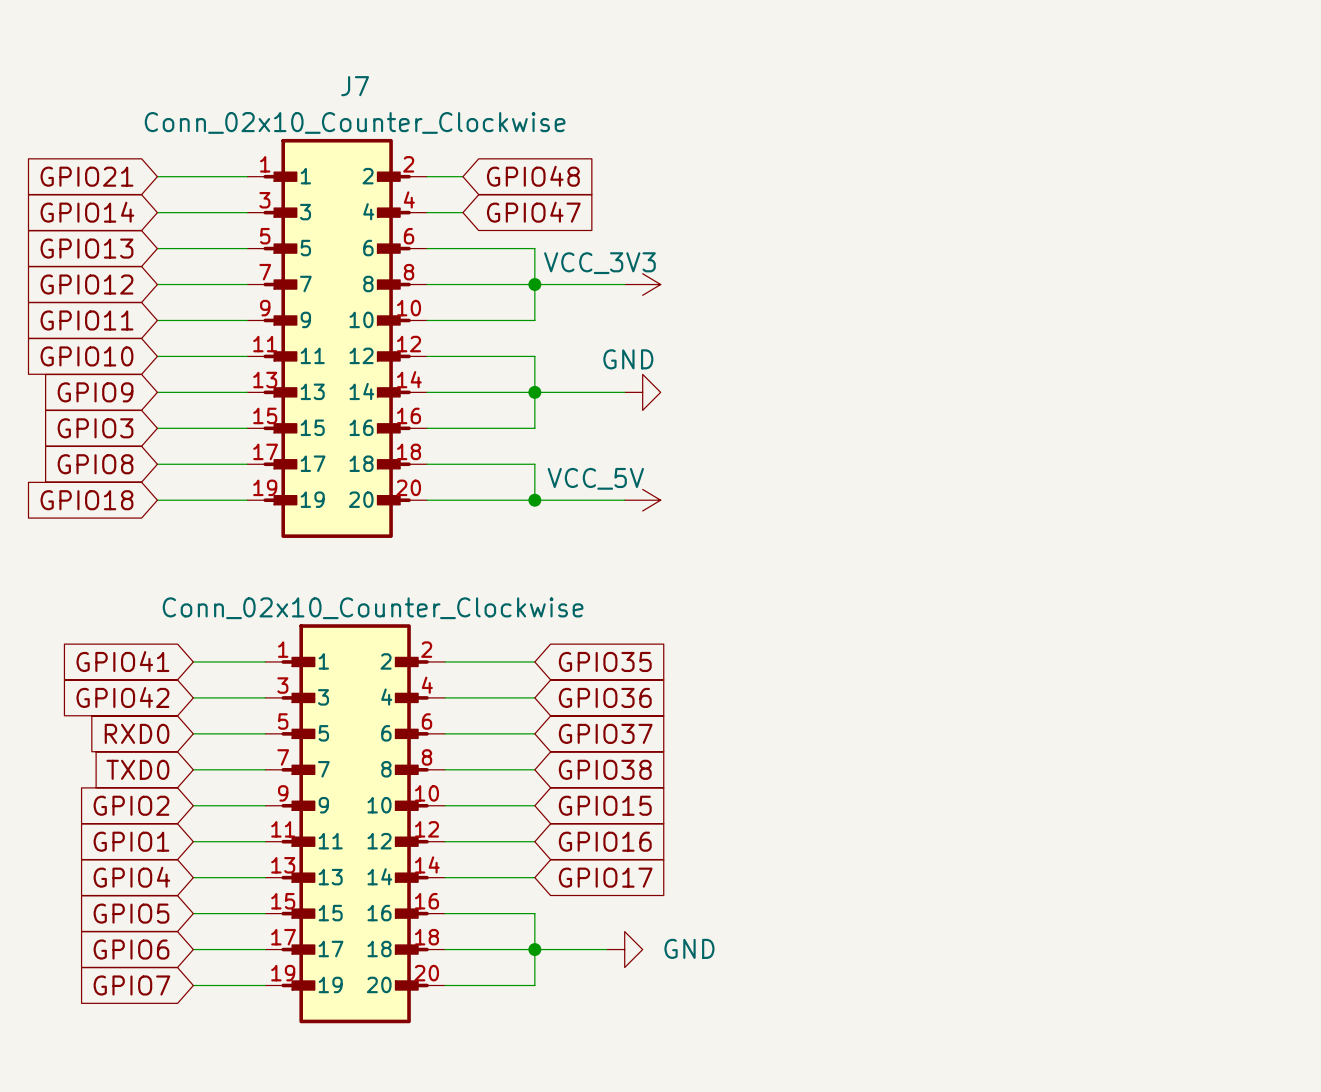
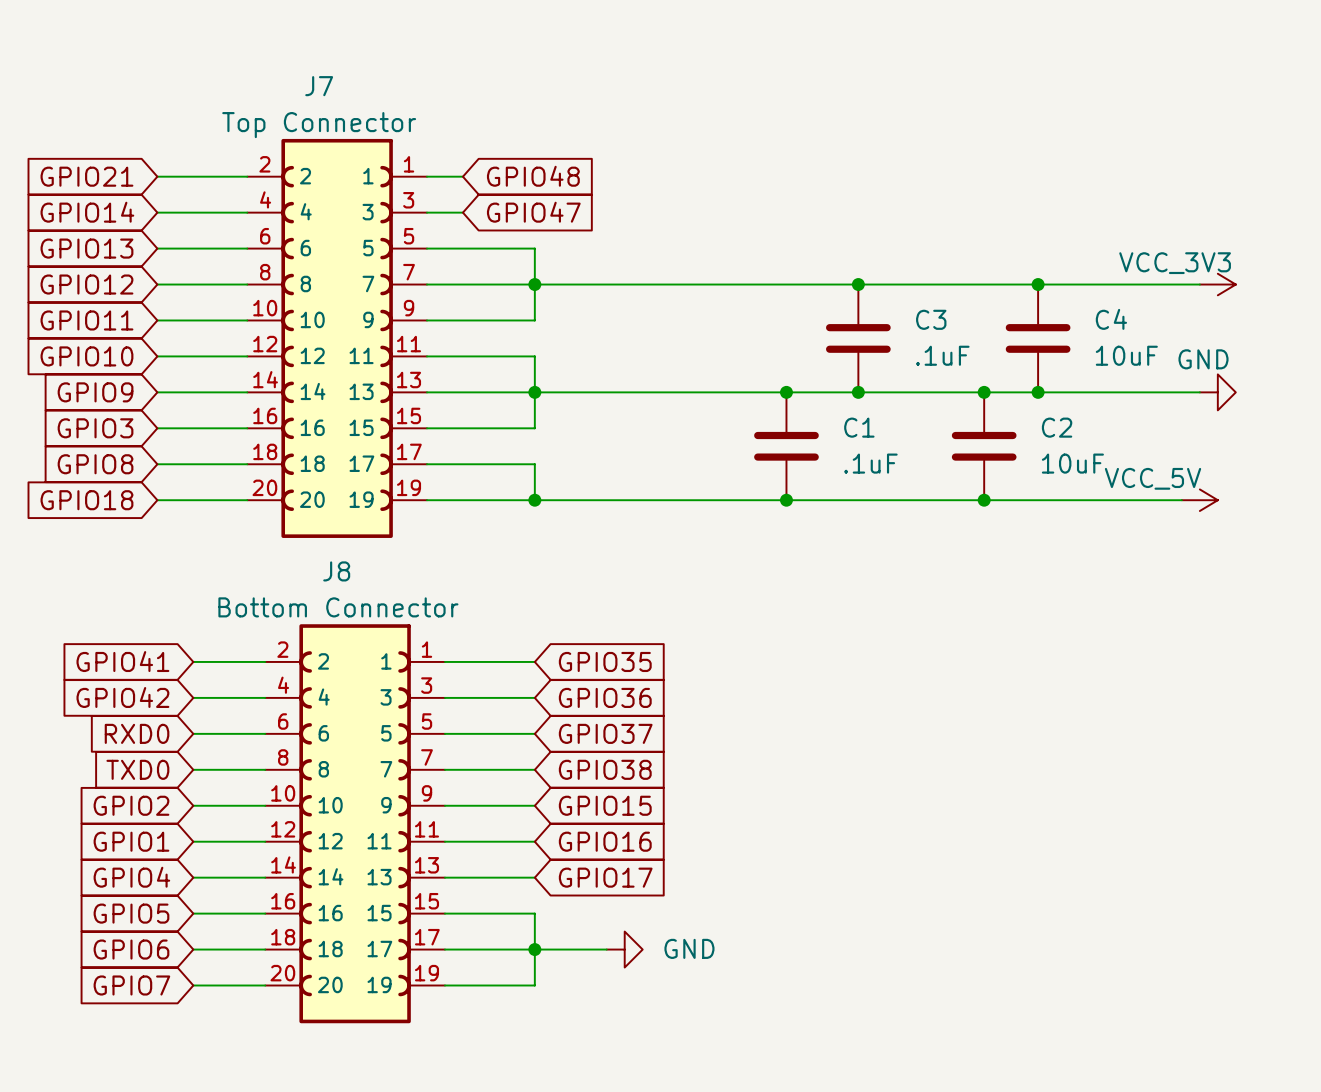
J7 name position: J7 (355, 86) -> J7 (319, 86)
J7 value: Conn_02x10_Counter_Clockwise (355, 122) -> Top Connector (319, 125)
J7 symbol: [247, 138, 428, 538] -> [247, 138, 428, 538]
wire: none -> (624, 284) (1199, 284)
power symbol: VCC_3V3 (642, 284) -> none
junction: none -> (858, 284)
junction: none -> (1038, 284)
power symbol: none -> VCC_3V3 (1217, 284)
C3: none -> .1uF (858, 338)
C4: none -> 10uF (1038, 338)
wire: none -> (624, 392) (1199, 392)
power symbol: GND (642, 392) -> none
junction: none -> (786, 392)
junction: none -> (858, 392)
junction: none -> (984, 392)
junction: none -> (1038, 392)
power symbol: none -> GND (1217, 392)
C1: none -> .1uF (786, 446)
C2: none -> 10uF (984, 446)
wire: none -> (624, 500) (1181, 500)
power symbol: VCC_5V (642, 500) -> none
junction: none -> (786, 500)
junction: none -> (984, 500)
power symbol: none -> VCC_5V (1199, 500)
part: Conn_02x10_Counter_Clockwise (355, 823) -> none
J8: none -> Bottom Connector (355, 823)

